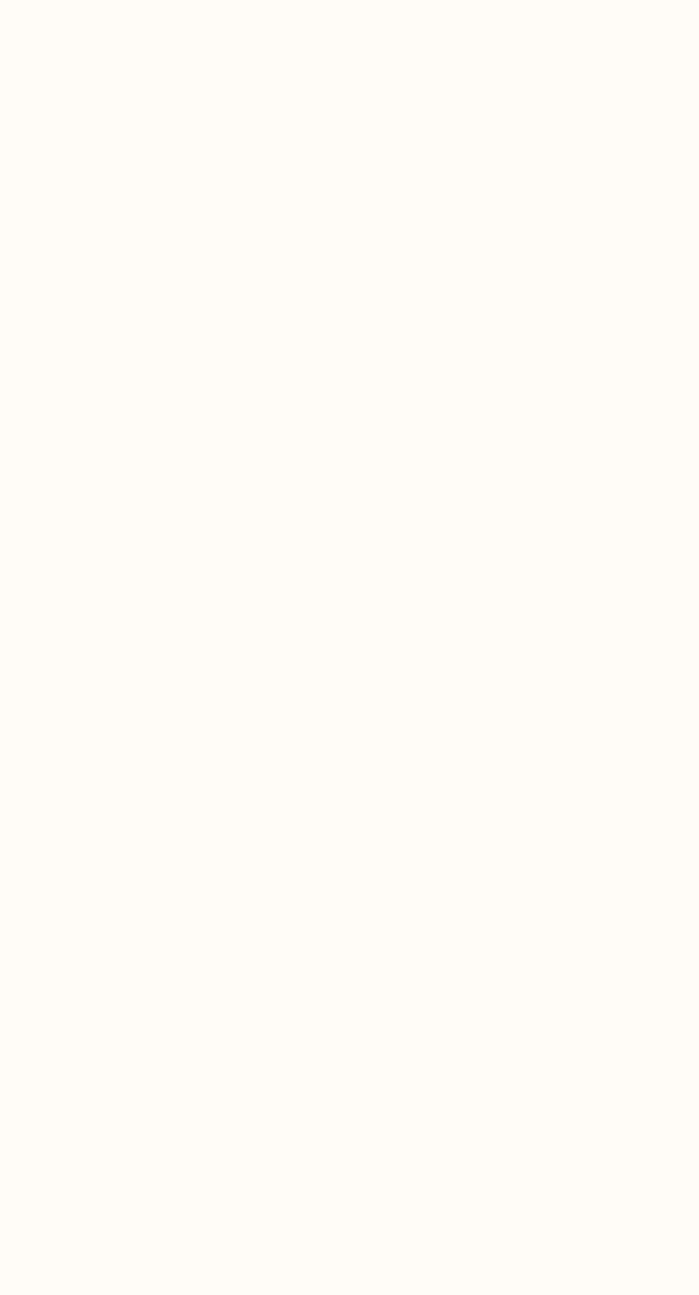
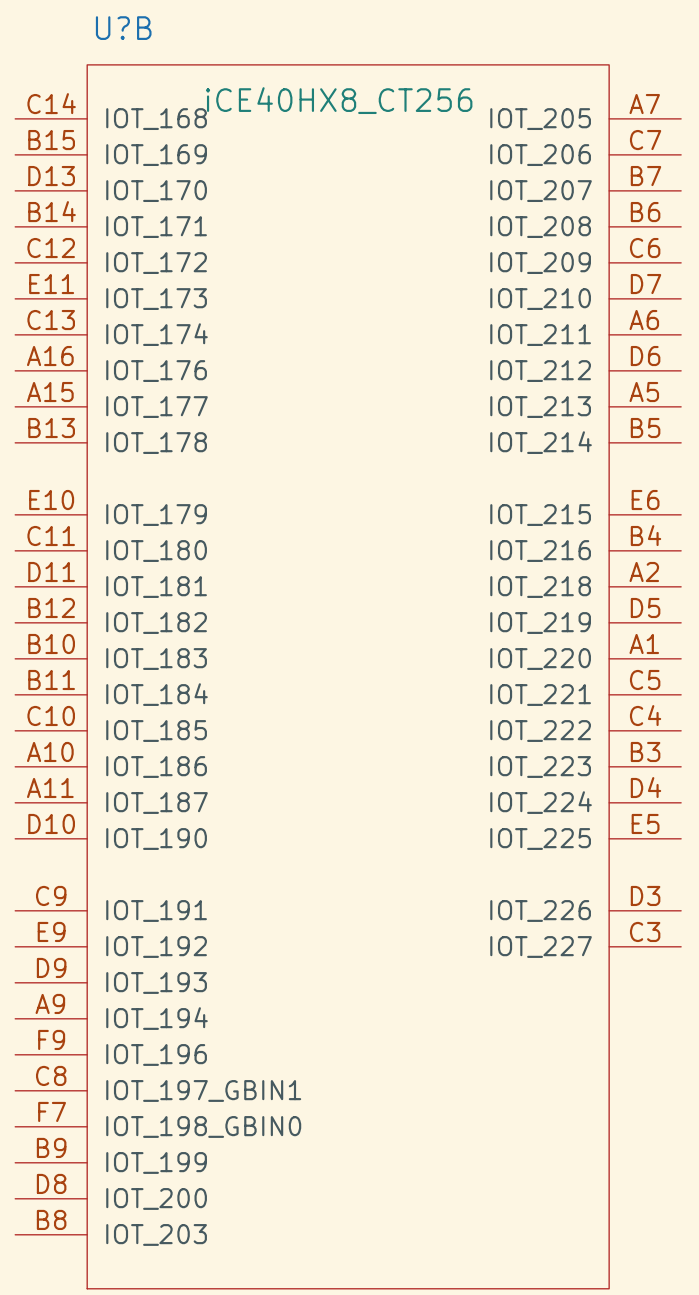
U?B: none -> iCE40HX8_CT256 (348, 676)

